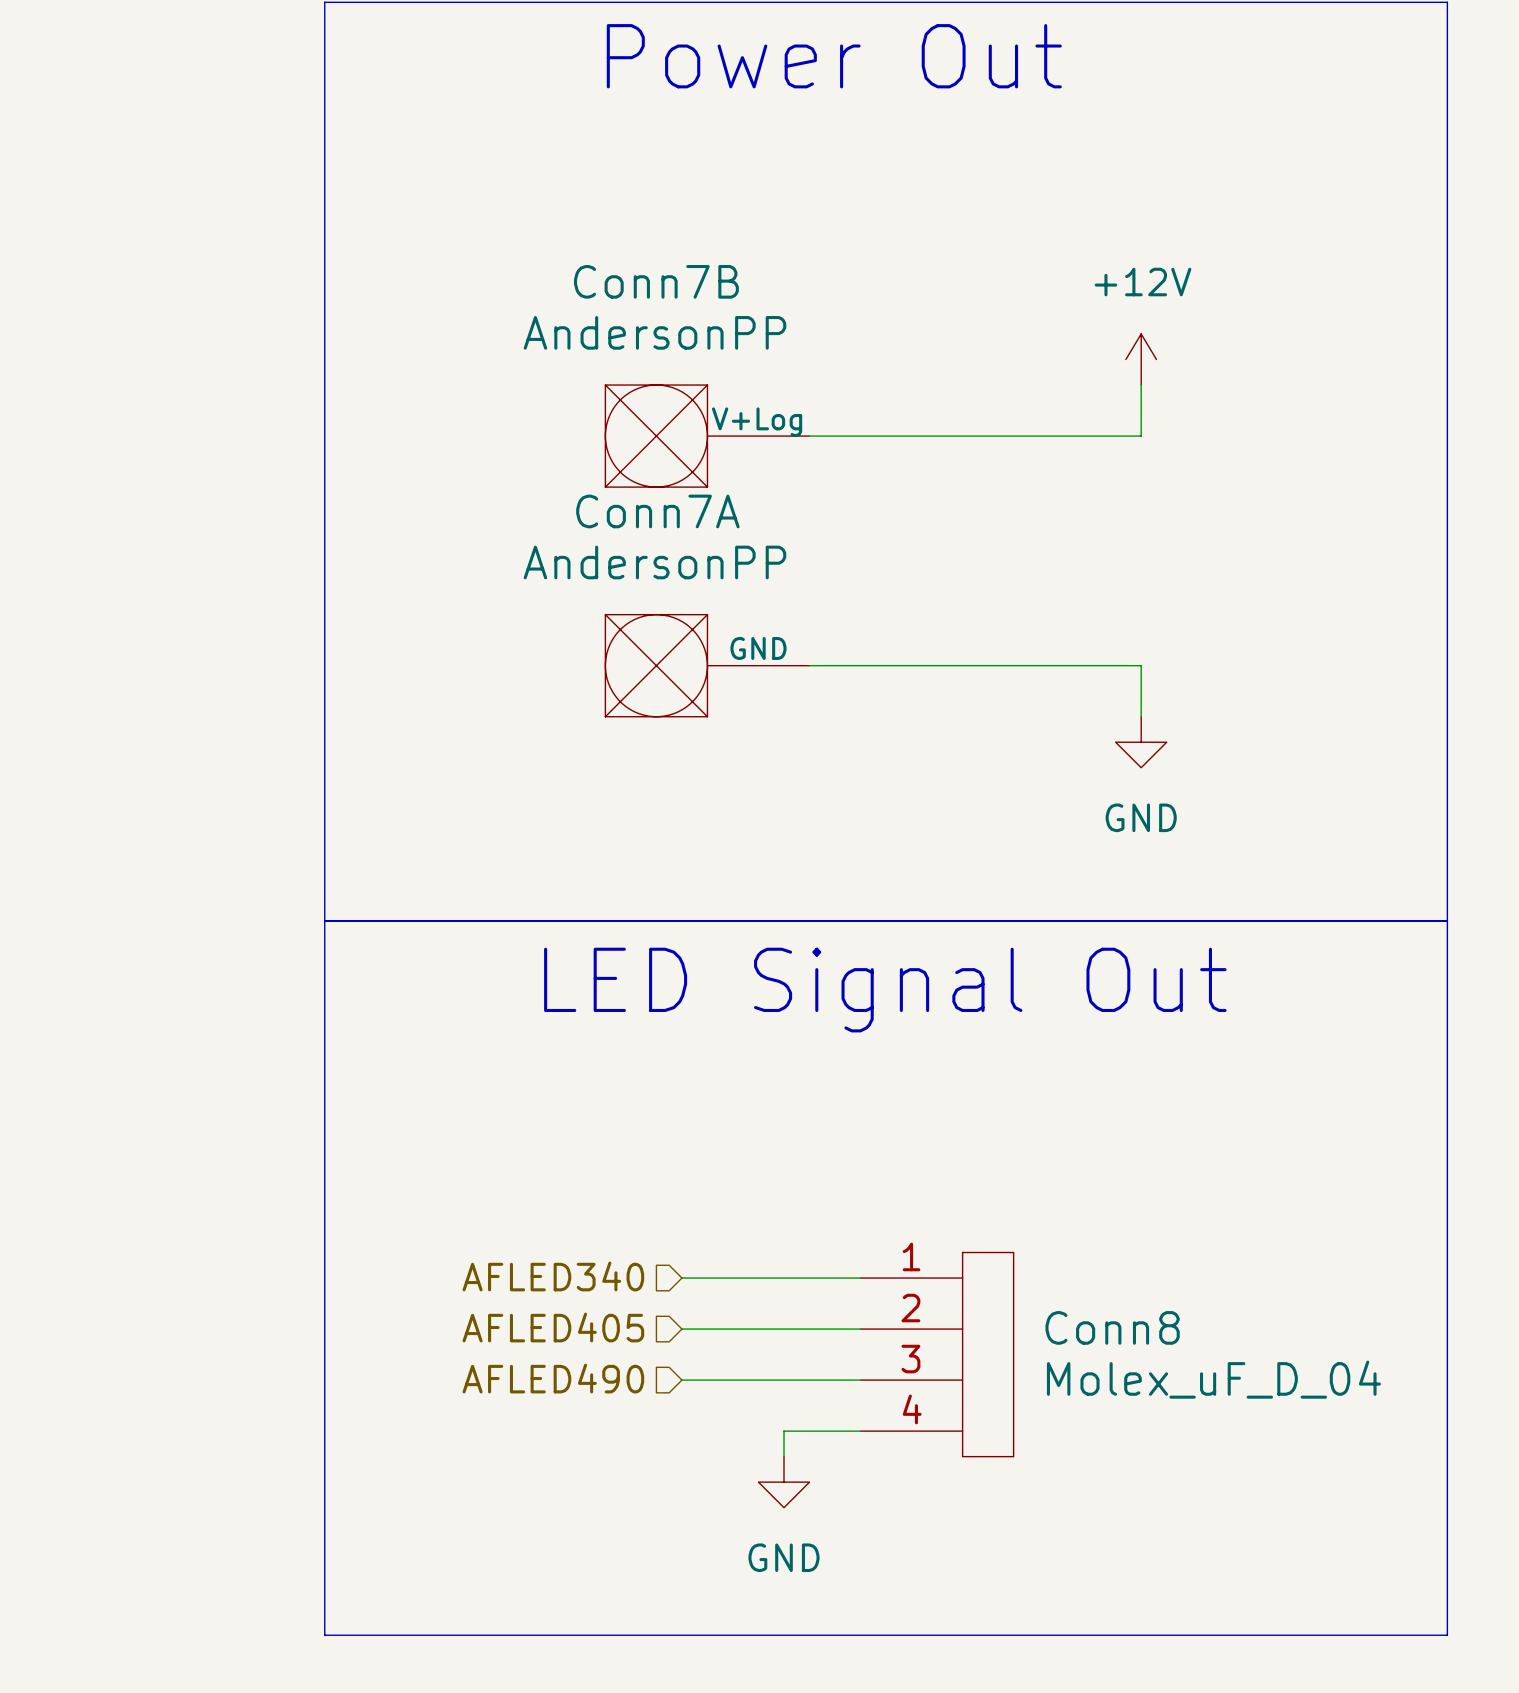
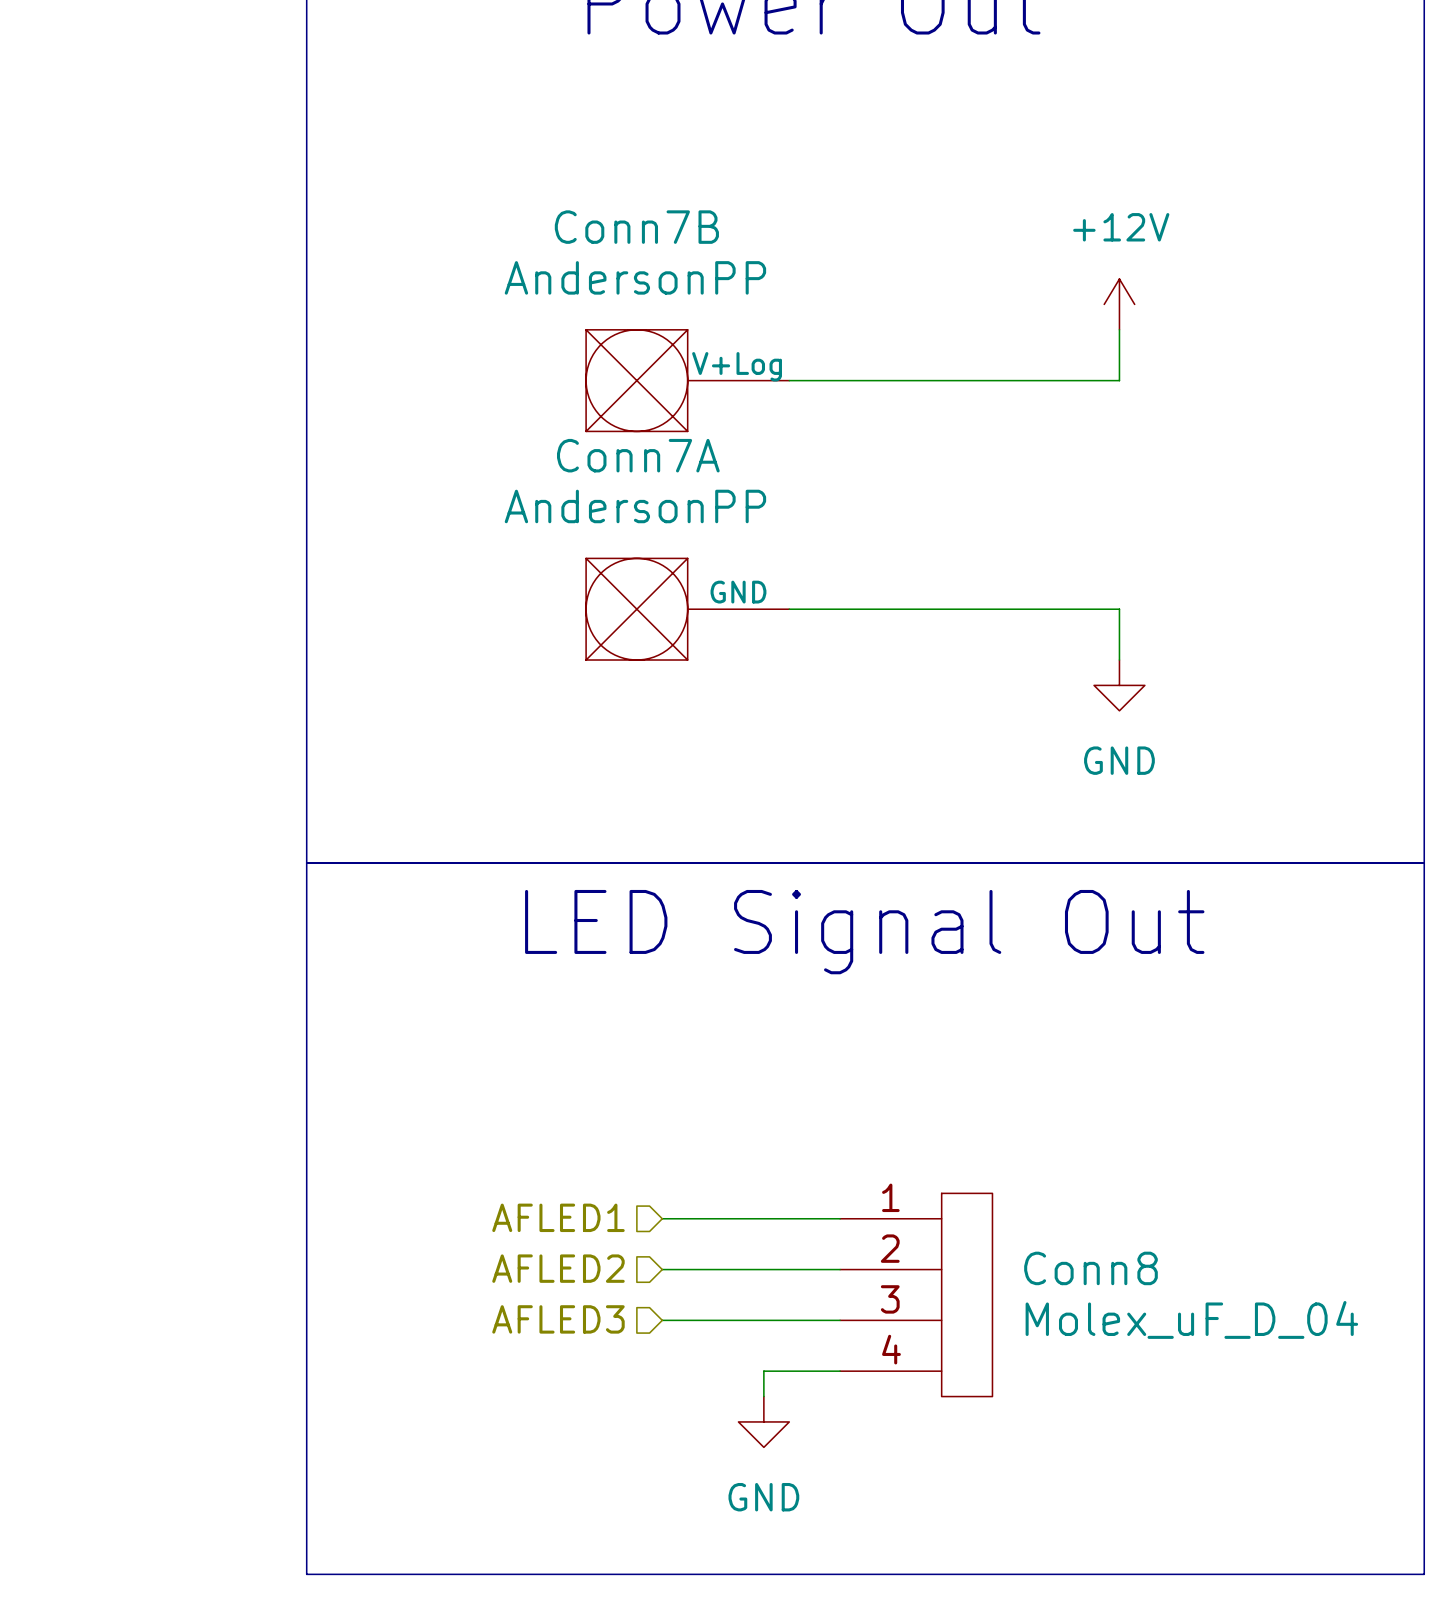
hierarchical label: AFLED340 (553, 1276) -> AFLED1 (558, 1217)
hierarchical label: AFLED405 (553, 1327) -> AFLED2 (558, 1268)
hierarchical label: AFLED490 (553, 1378) -> AFLED3 (558, 1319)

